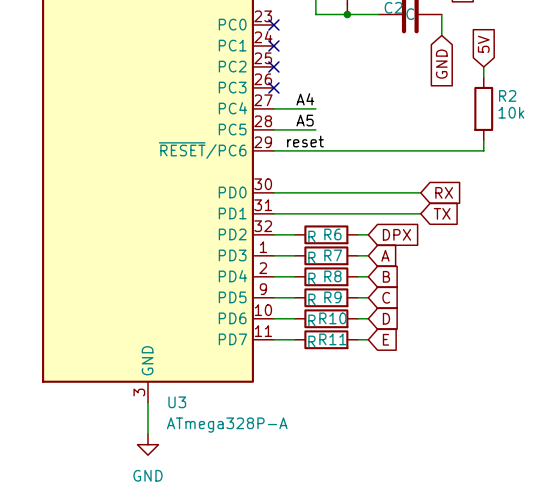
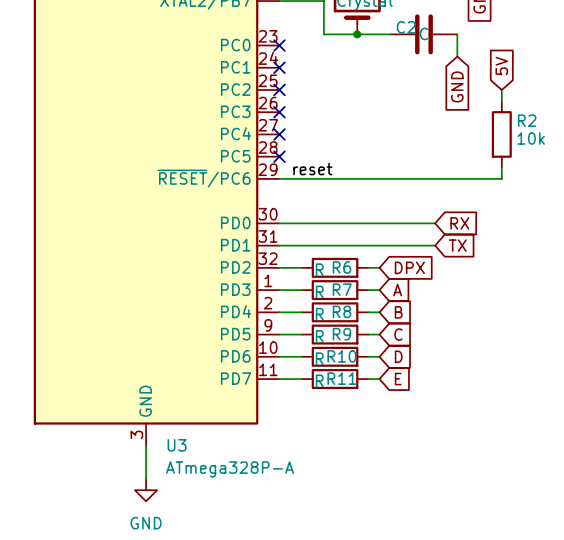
label: A4 (305, 99) -> none
wire: (273, 108) (315, 108) -> none
no-connect mark: none -> (279, 134)
label: A5 (305, 120) -> none
wire: (273, 129) (315, 129) -> none
no-connect mark: none -> (279, 156)

